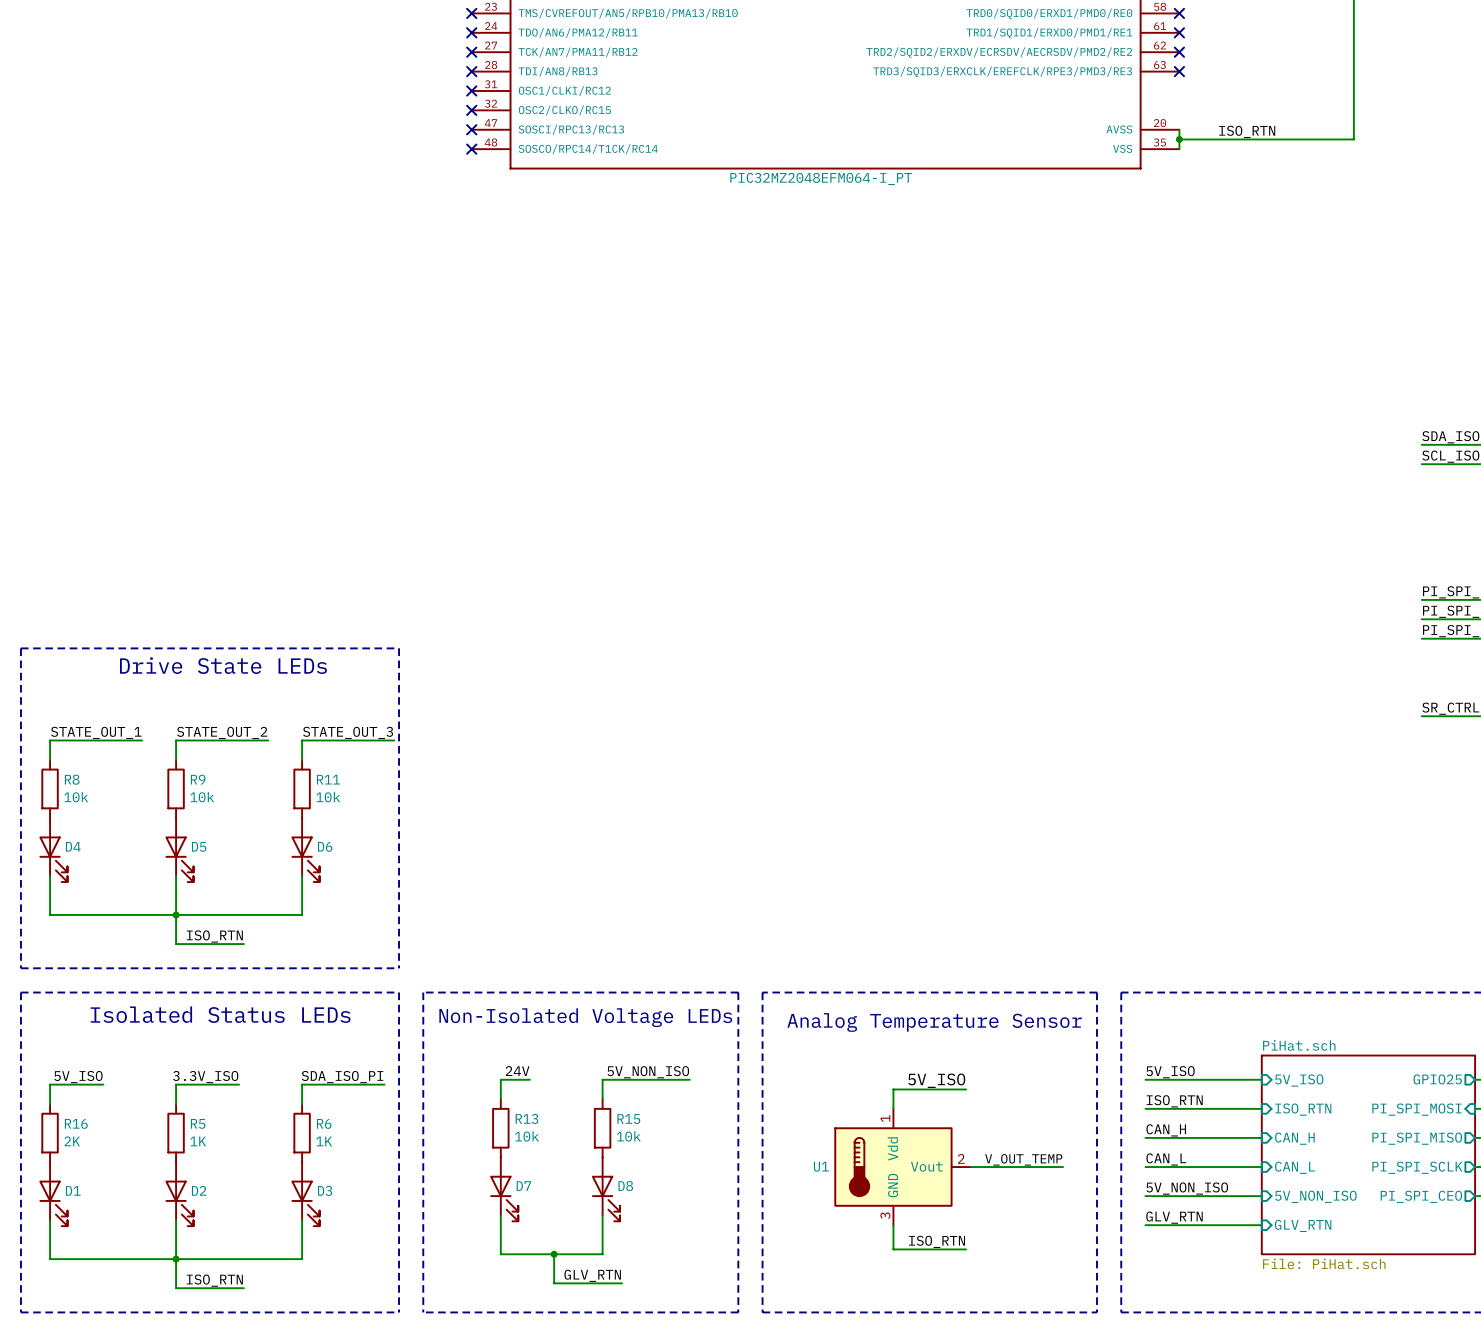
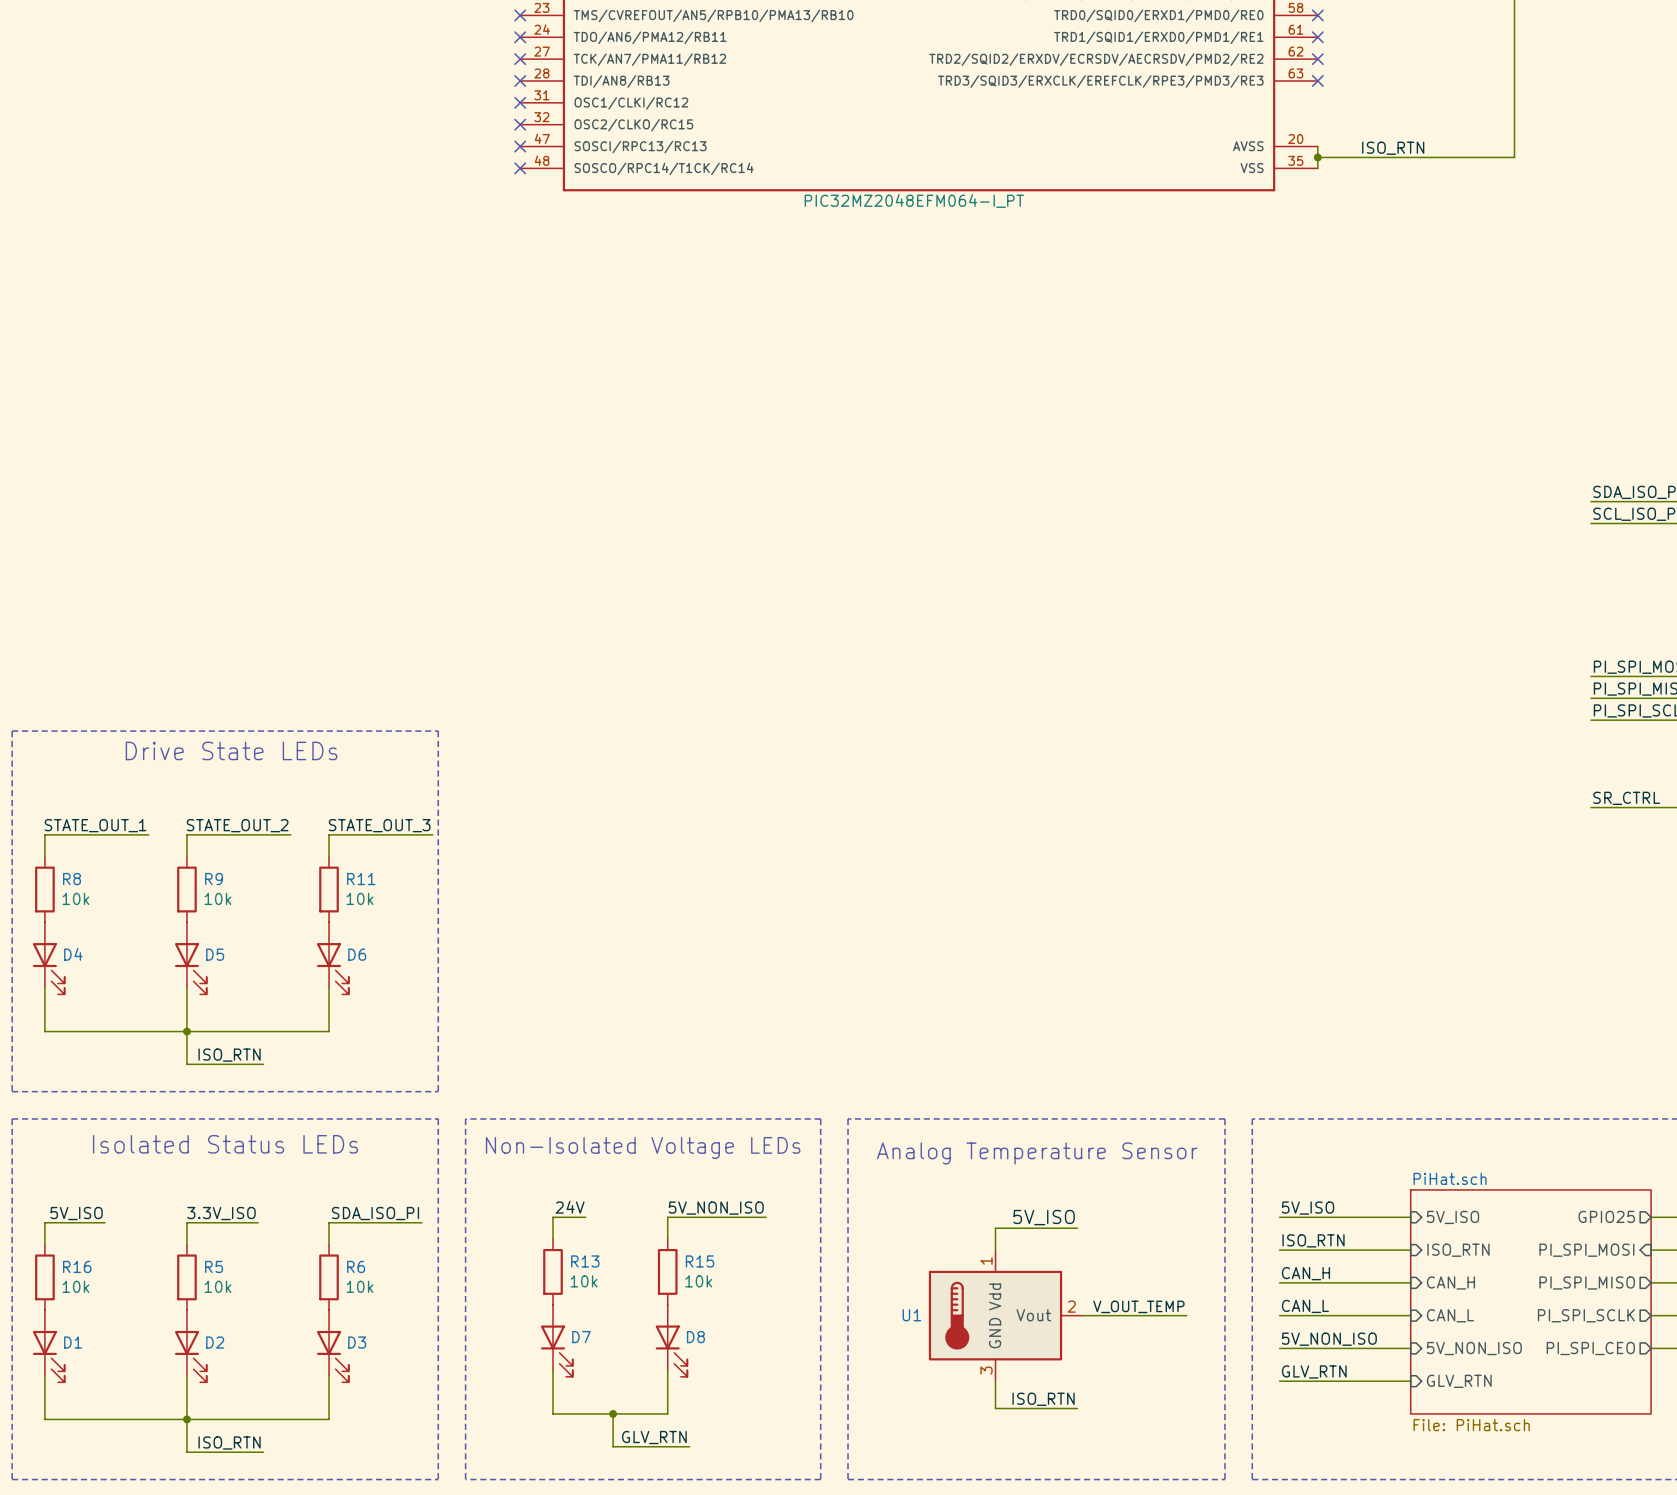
R16 value: 2K (72, 1141) -> 10k (75, 1286)
R5 value: 1K (198, 1141) -> 10k (217, 1286)
R6 value: 1K (324, 1141) -> 10k (360, 1286)

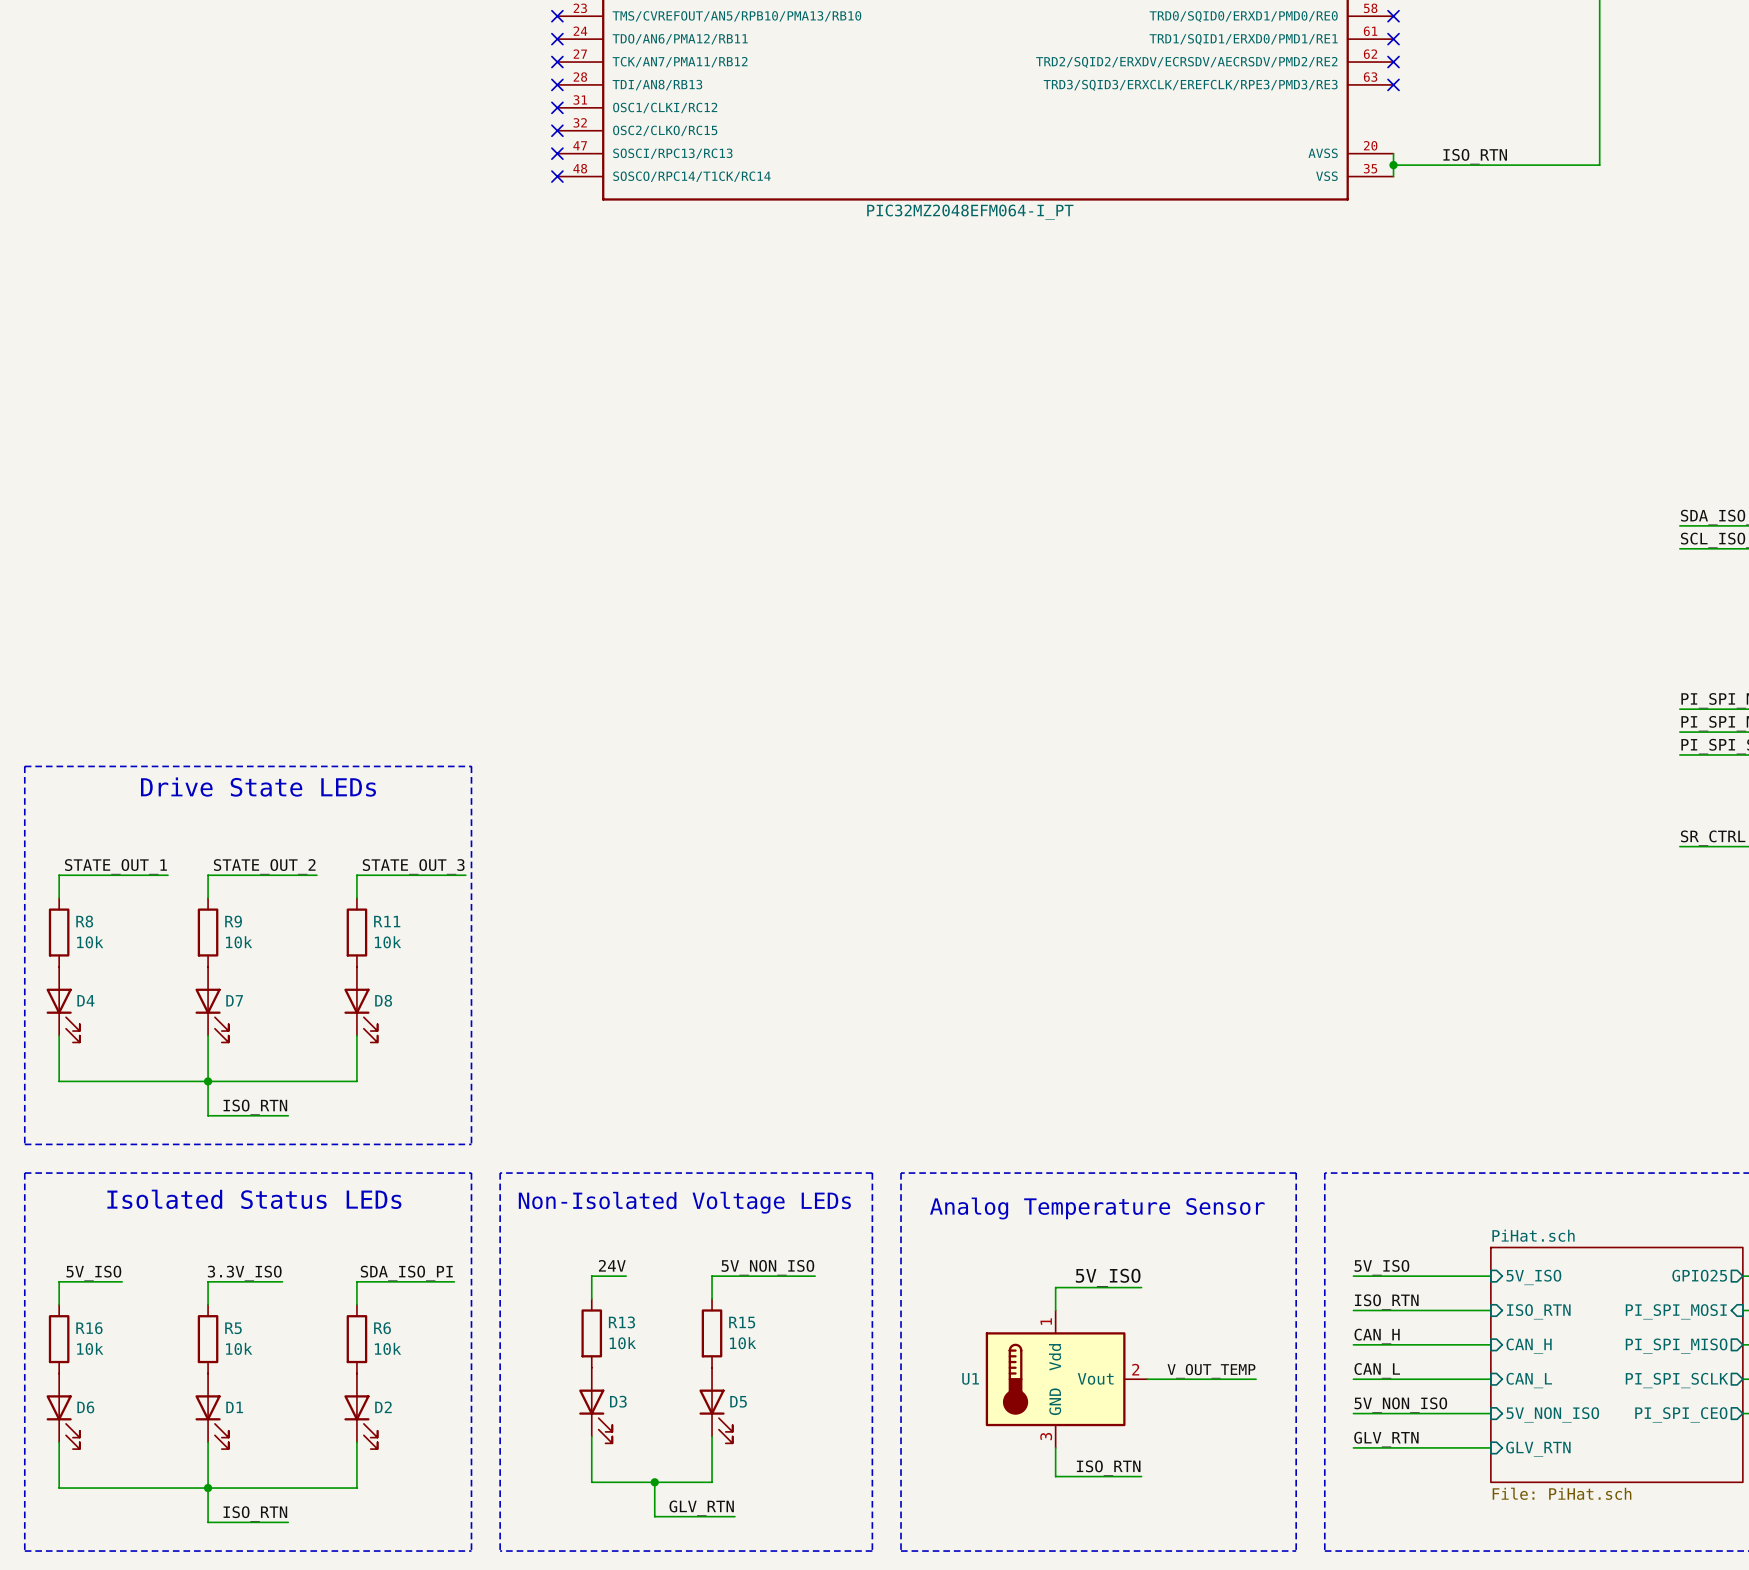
D5 name: D5 (215, 954) -> D7 (234, 1000)
D6 name: D6 (357, 954) -> D8 (383, 1000)
D7 name: D7 (581, 1337) -> D3 (618, 1401)
D8 name: D8 (695, 1337) -> D5 (738, 1401)
D1 name: D1 (73, 1342) -> D6 (85, 1407)
D2 name: D2 (215, 1342) -> D1 (234, 1407)
D3 name: D3 (357, 1342) -> D2 (383, 1407)

